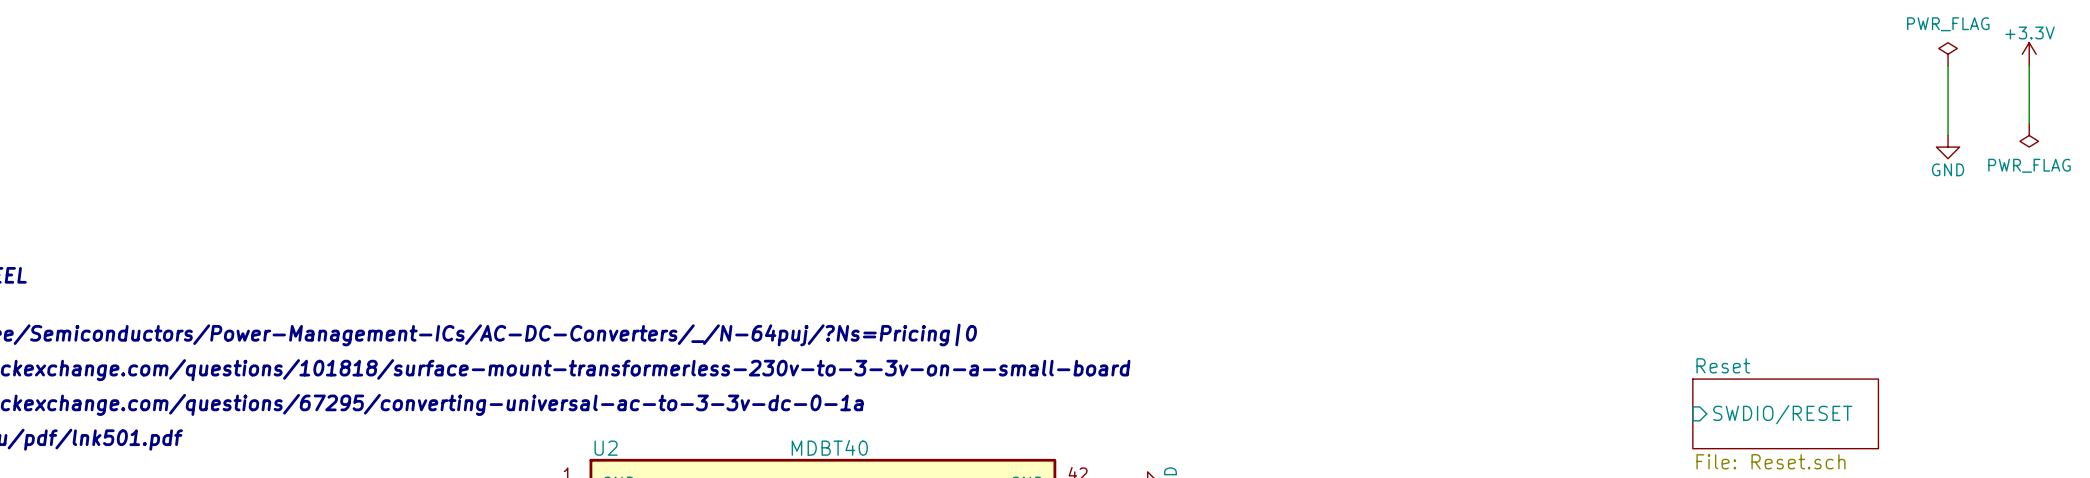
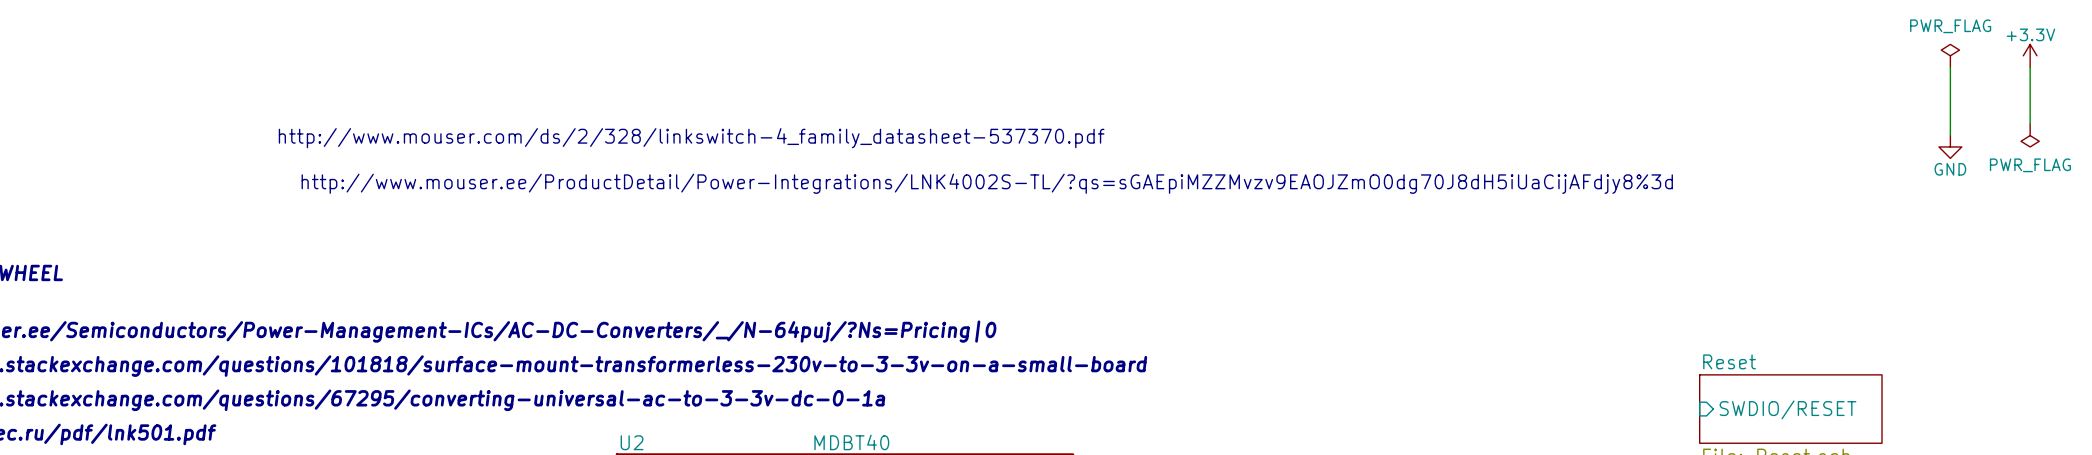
text: none -> http://www.mouser.com/ds/2/328/linkswitch-4_family_datasheet-537370.pdf (691, 138)
text: none -> http://www.mouser.ee/ProductDetail/Power-Integrations/LNK4002S-TL/?qs=sGAEpiMZZMvzv9EAOJZmO0dg70J8dH5iUaCijAFdjy8%3d (987, 183)

